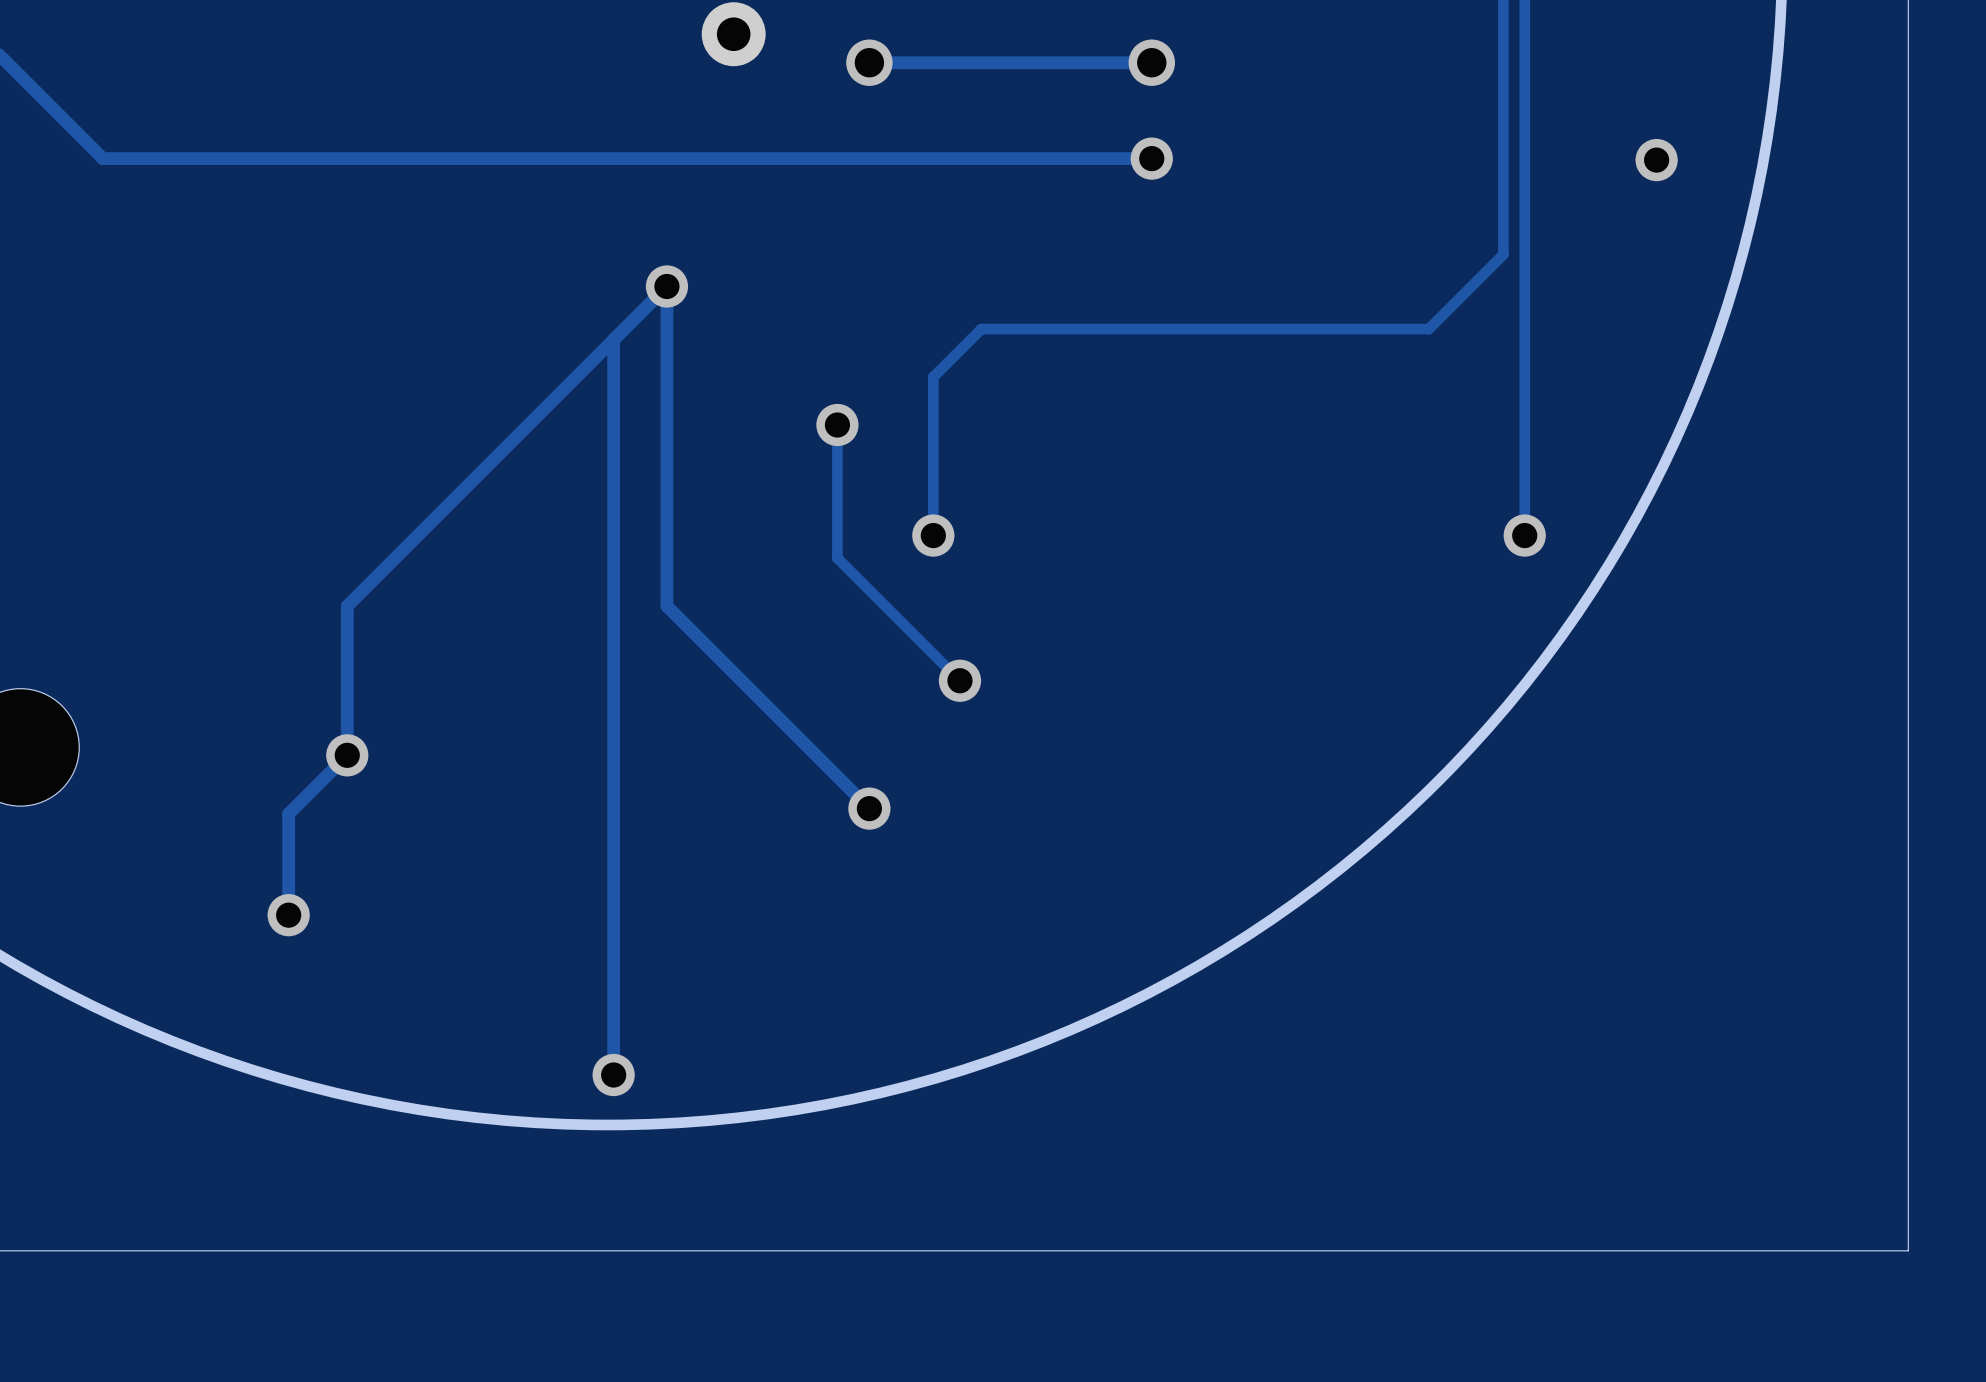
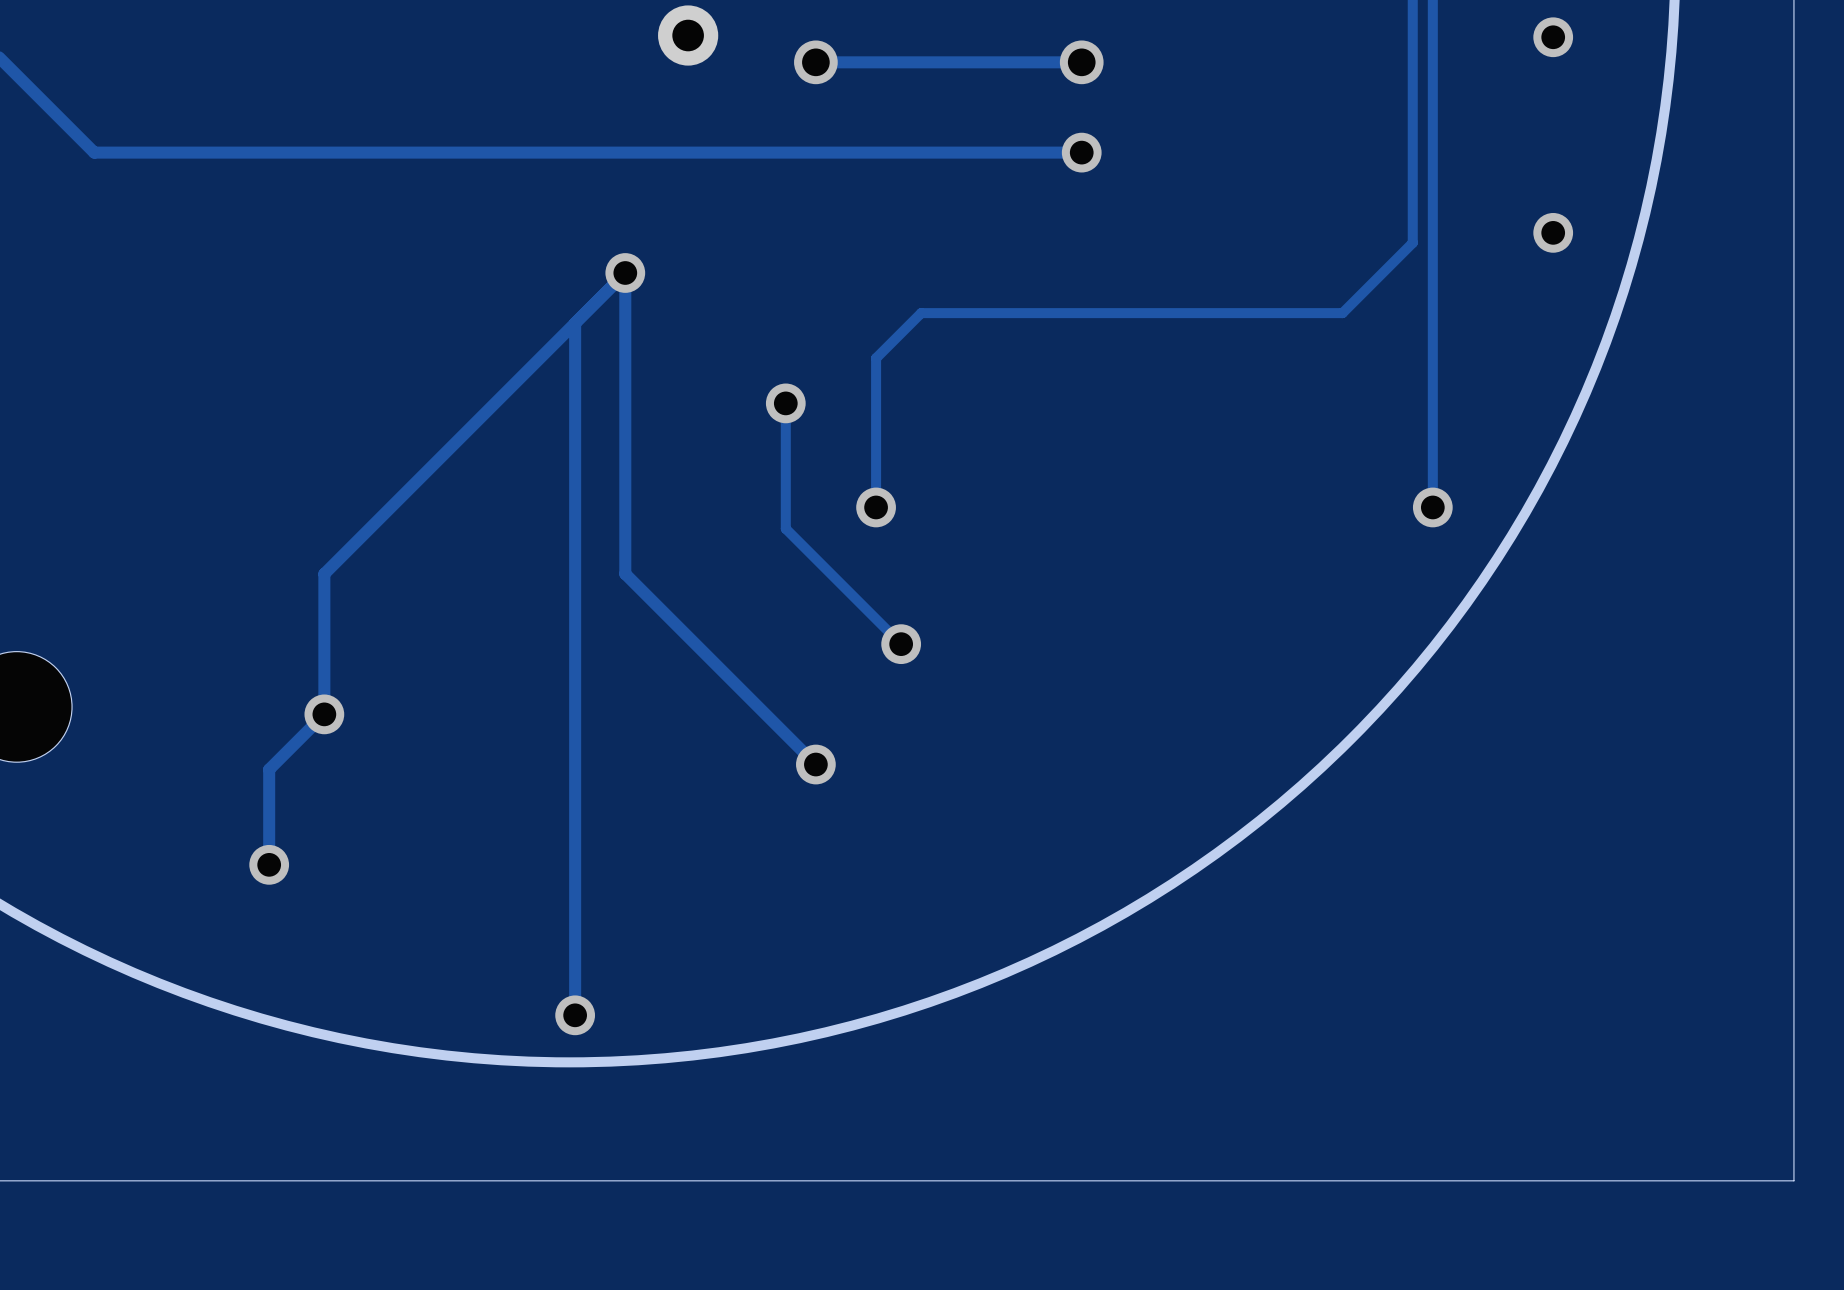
via: none -> (1553, 37)
via: (1656, 160) -> none
via: none -> (1553, 232)

